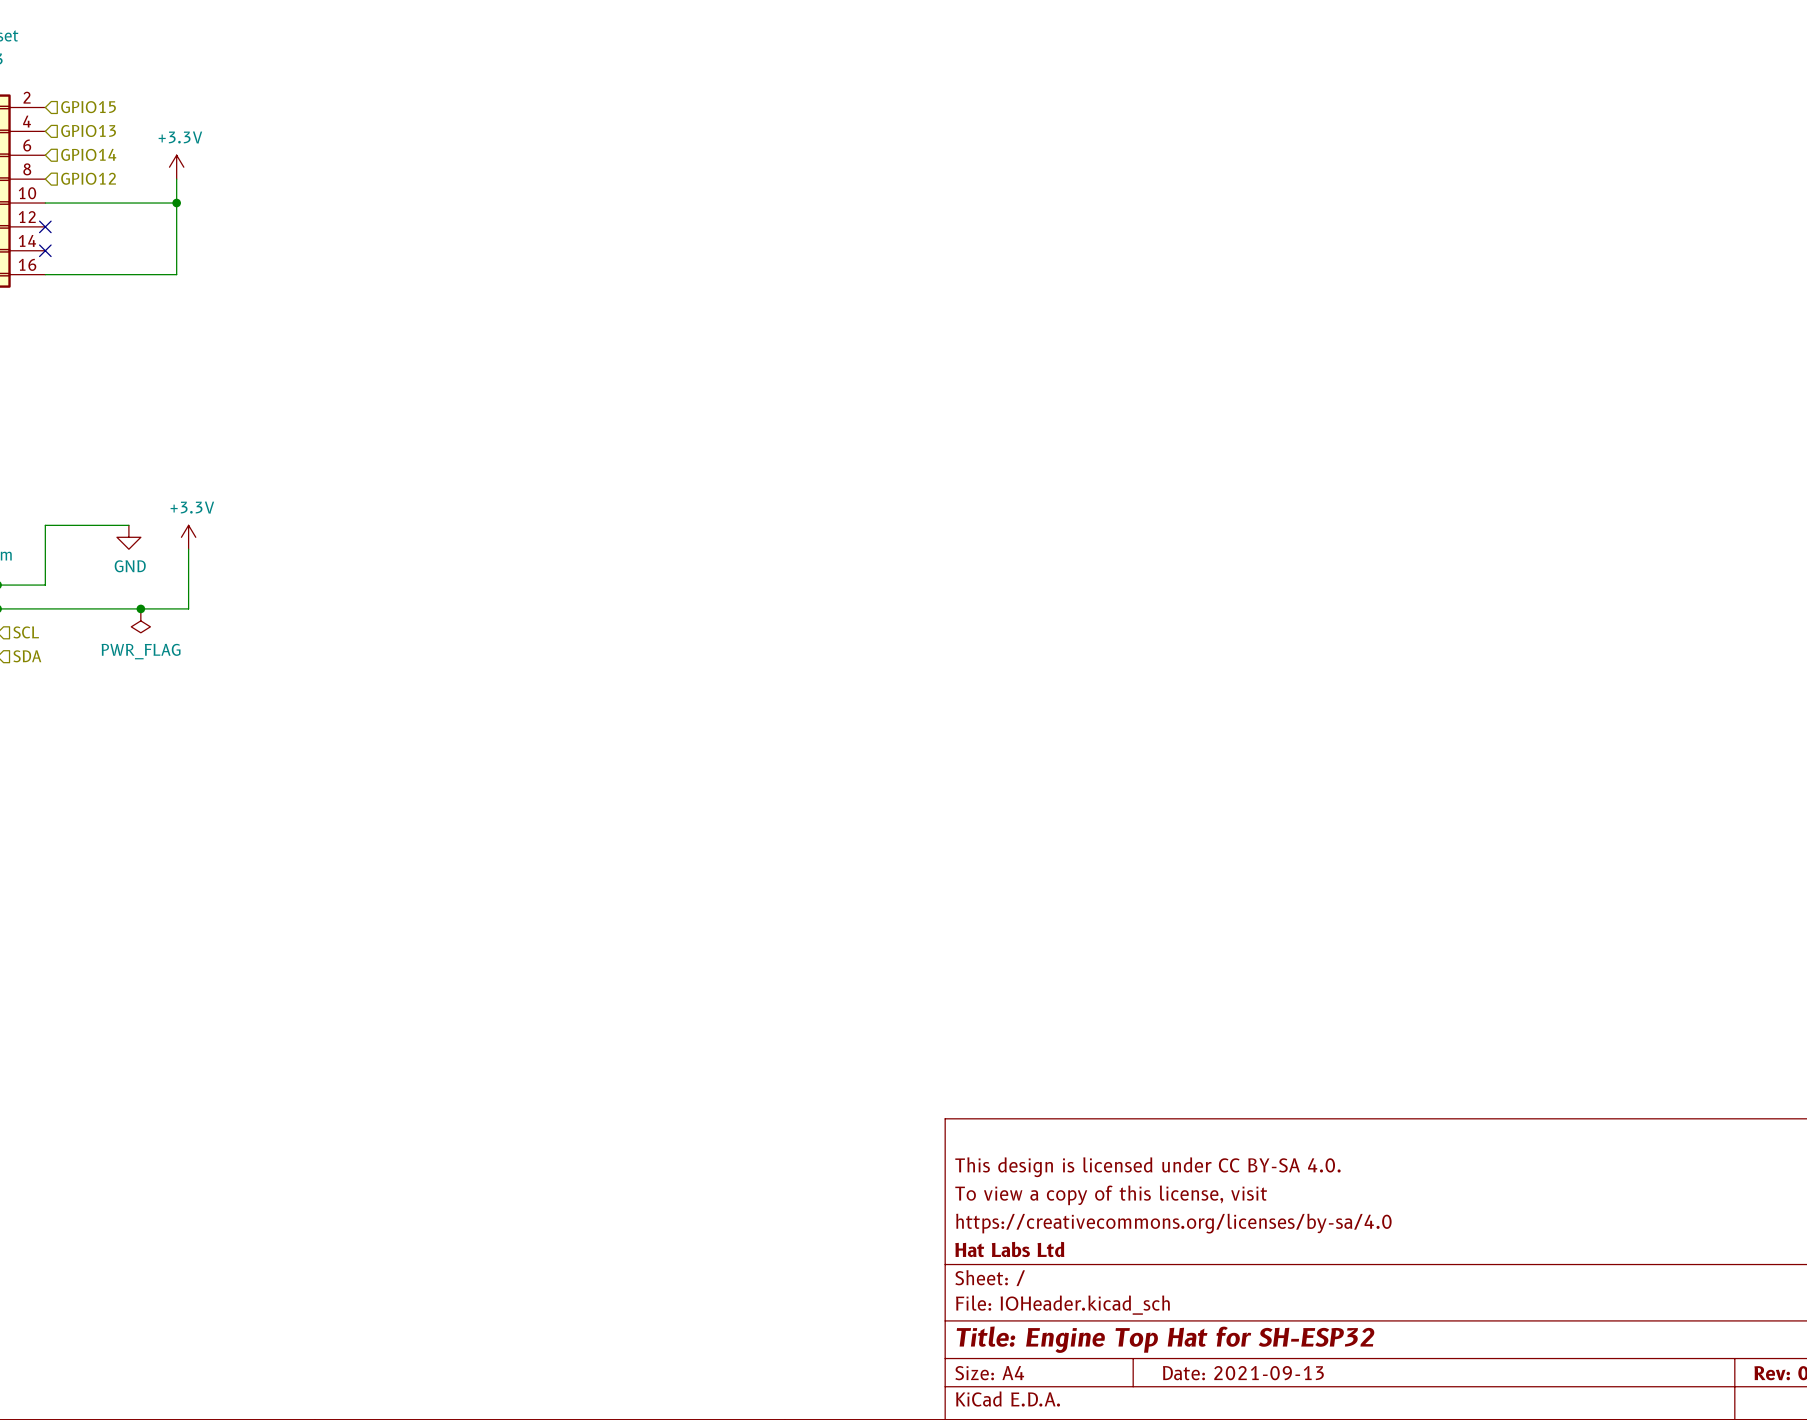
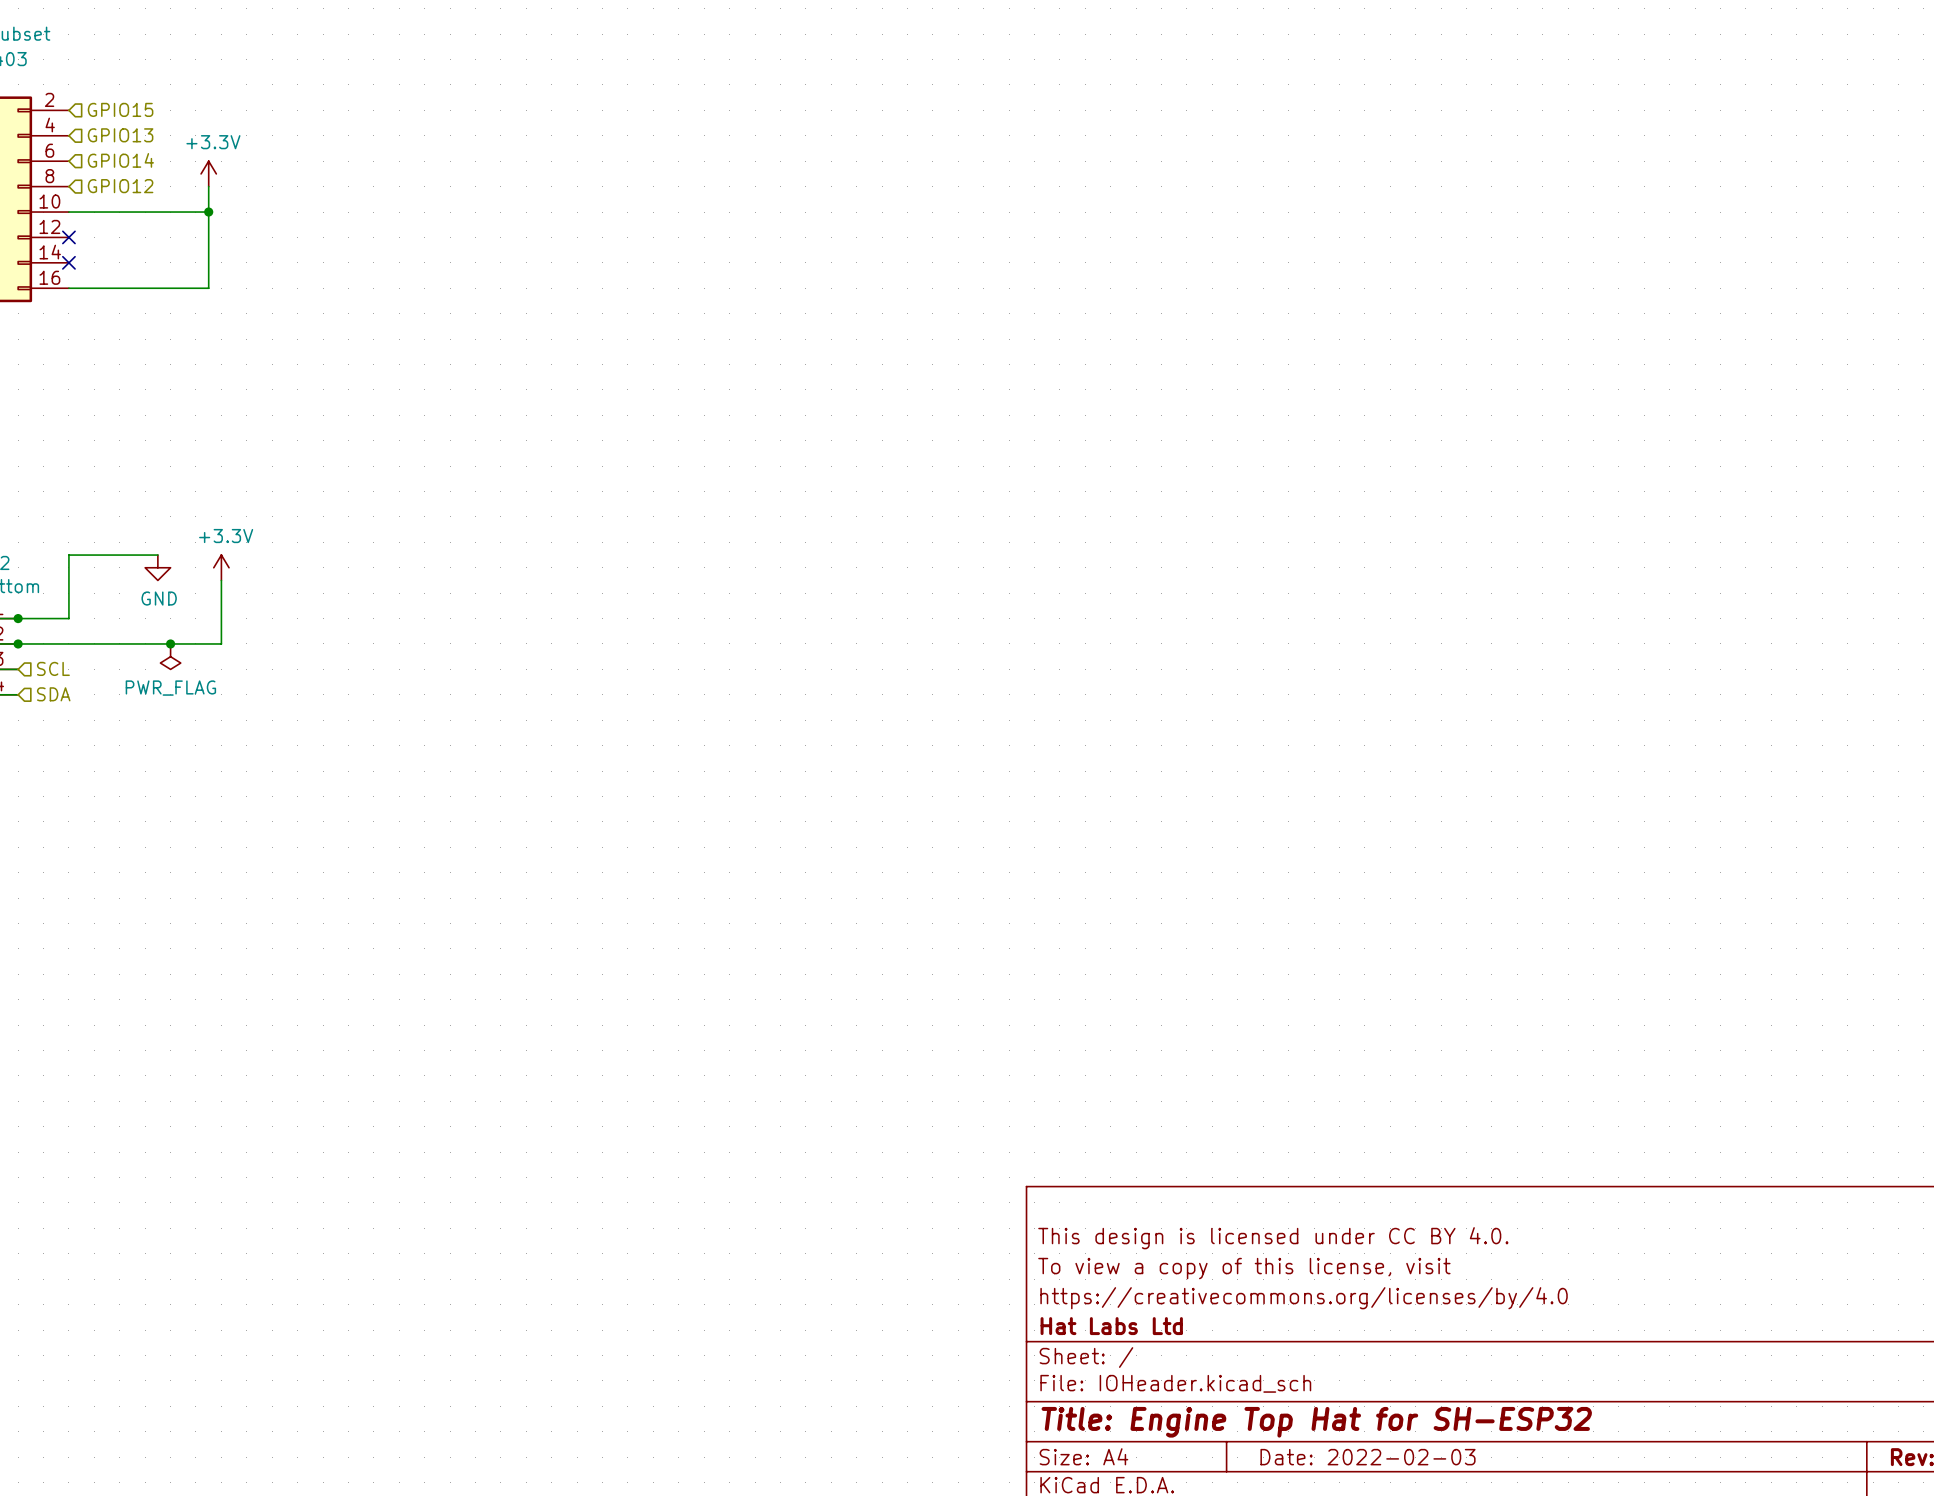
title block: This design is licensed under CC BY-SA 4.0. (1147, 1167) -> This design is licensed under CC BY 4.0. (1273, 1238)
title block: https://creativecommons.org/licenses/by-sa/4.0 (1173, 1223) -> https://creativecommons.org/licenses/by/4.0 (1304, 1298)
title block: Date: 2021-09-13 (1243, 1373) -> Date: 2022-02-03 (1368, 1457)

